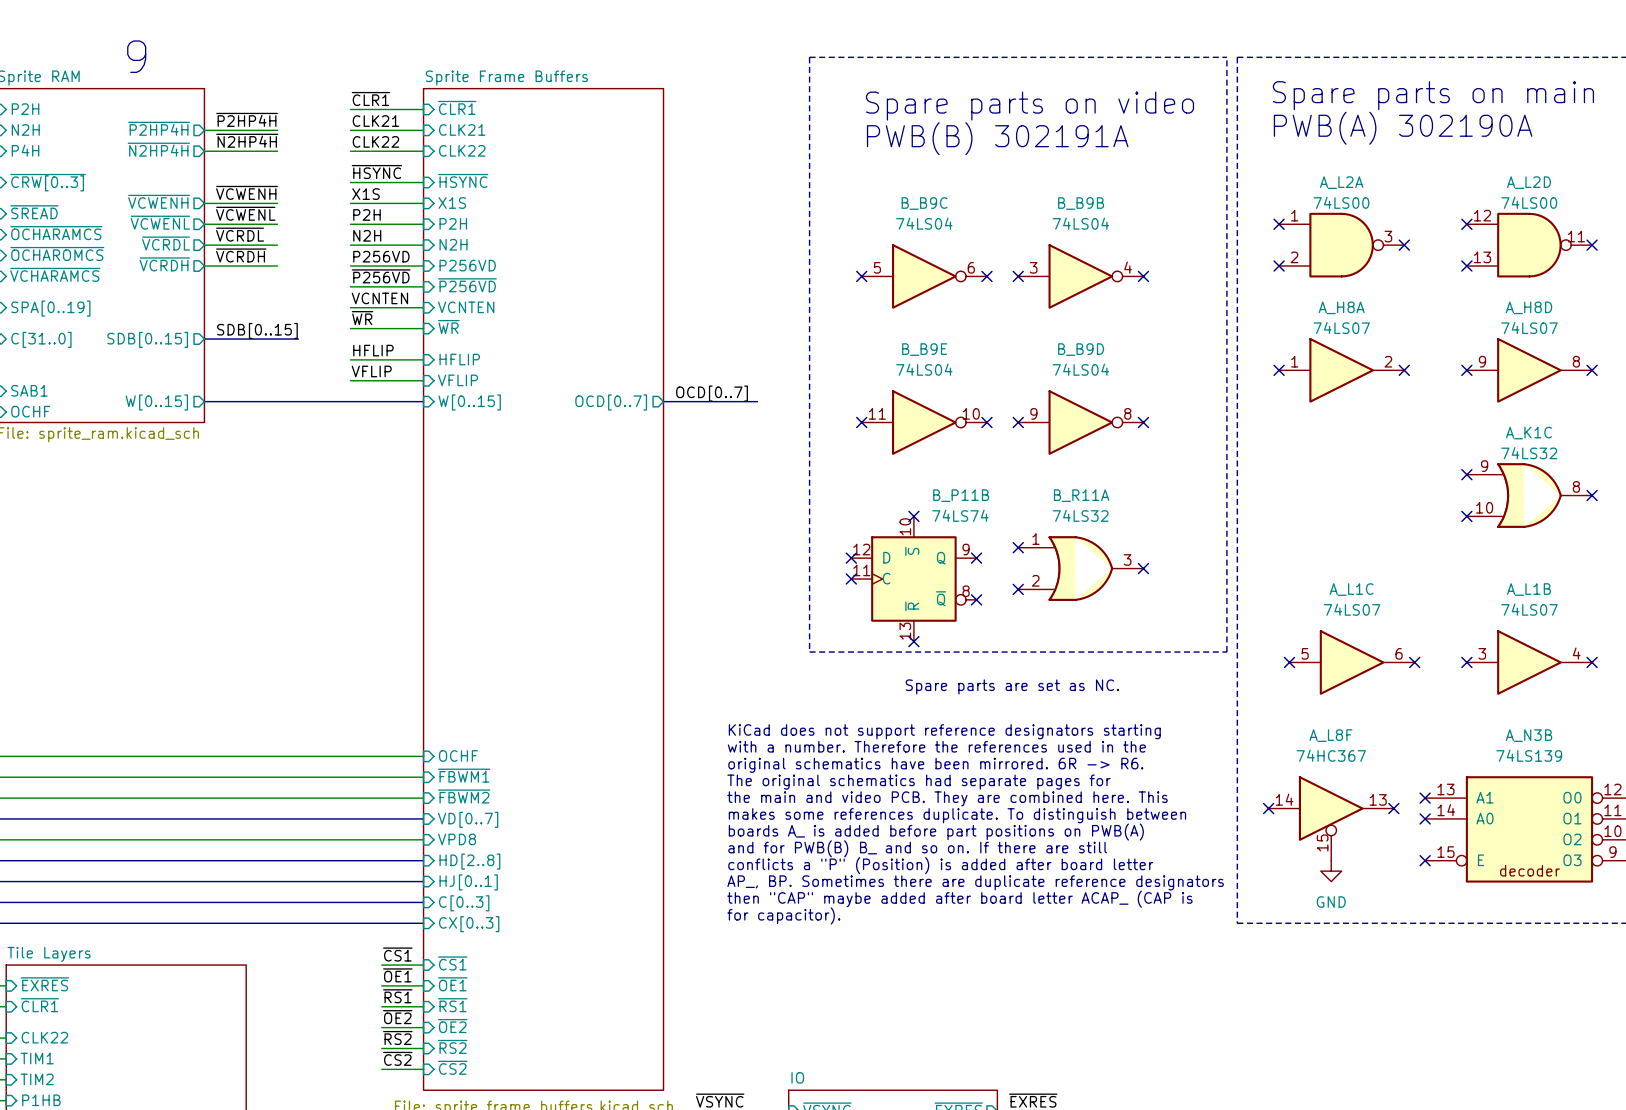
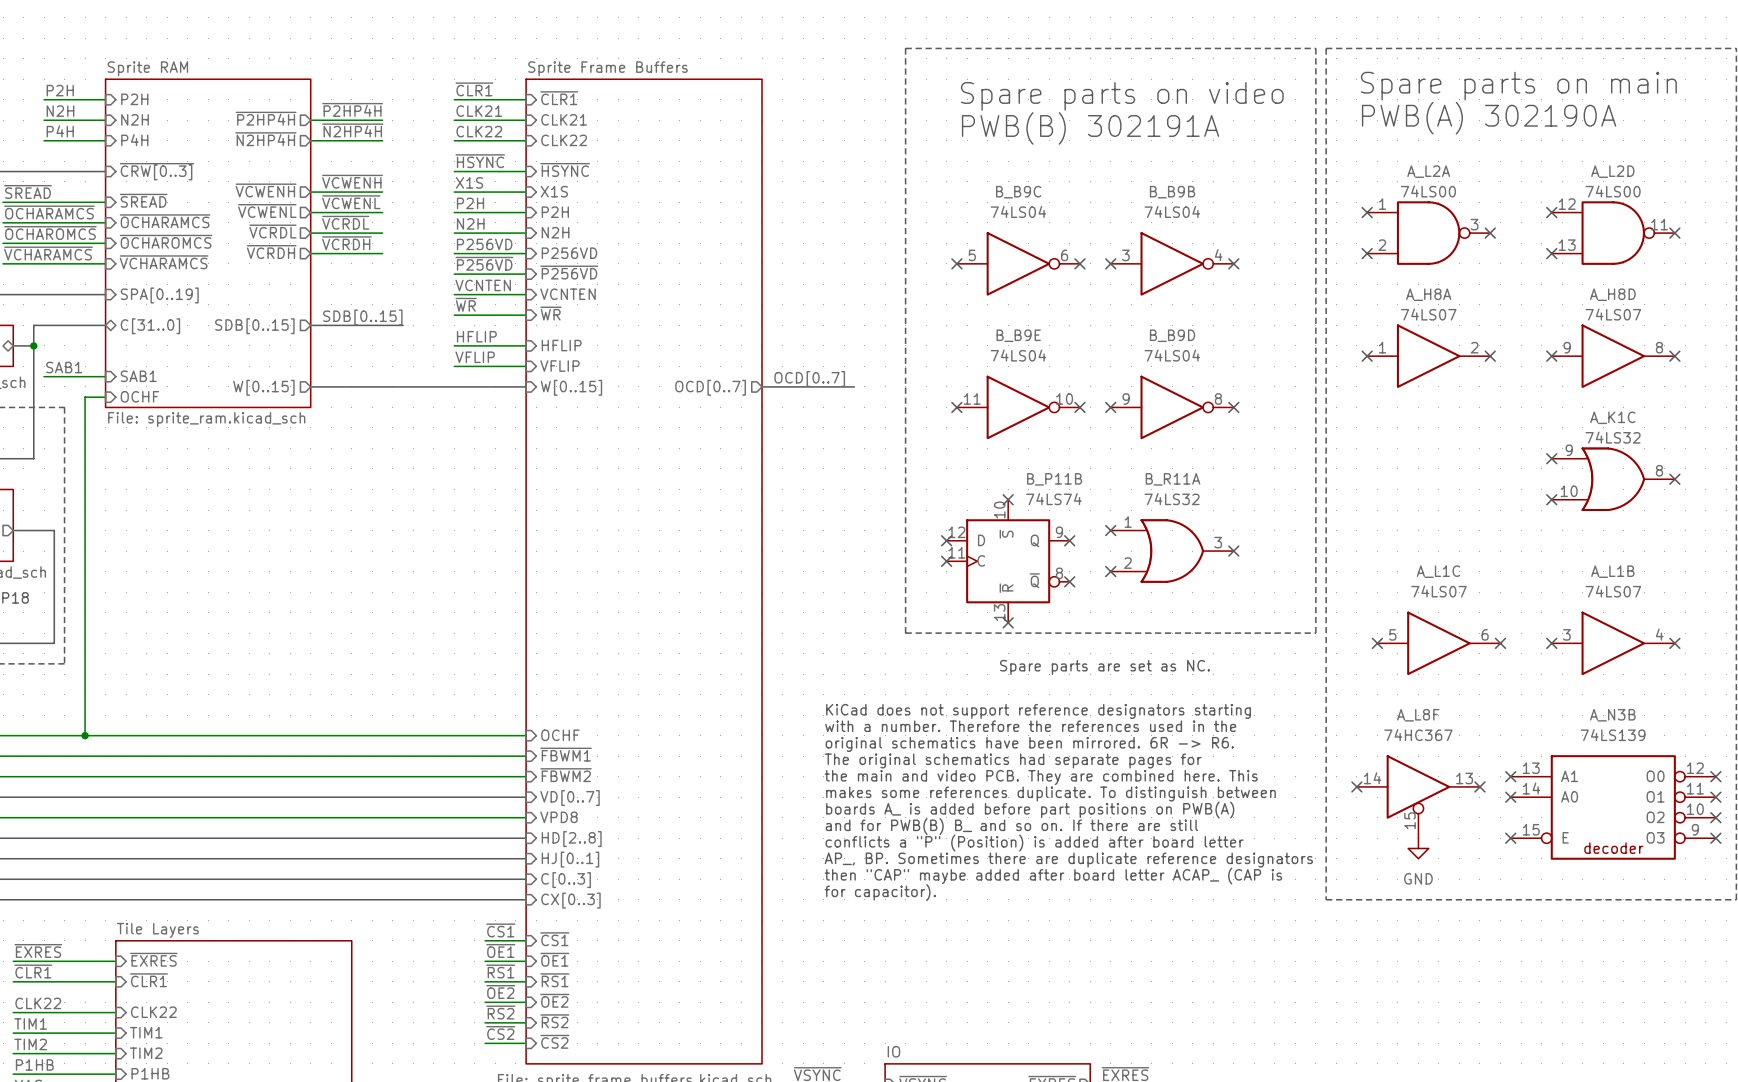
text: 9 (136, 56) -> none

